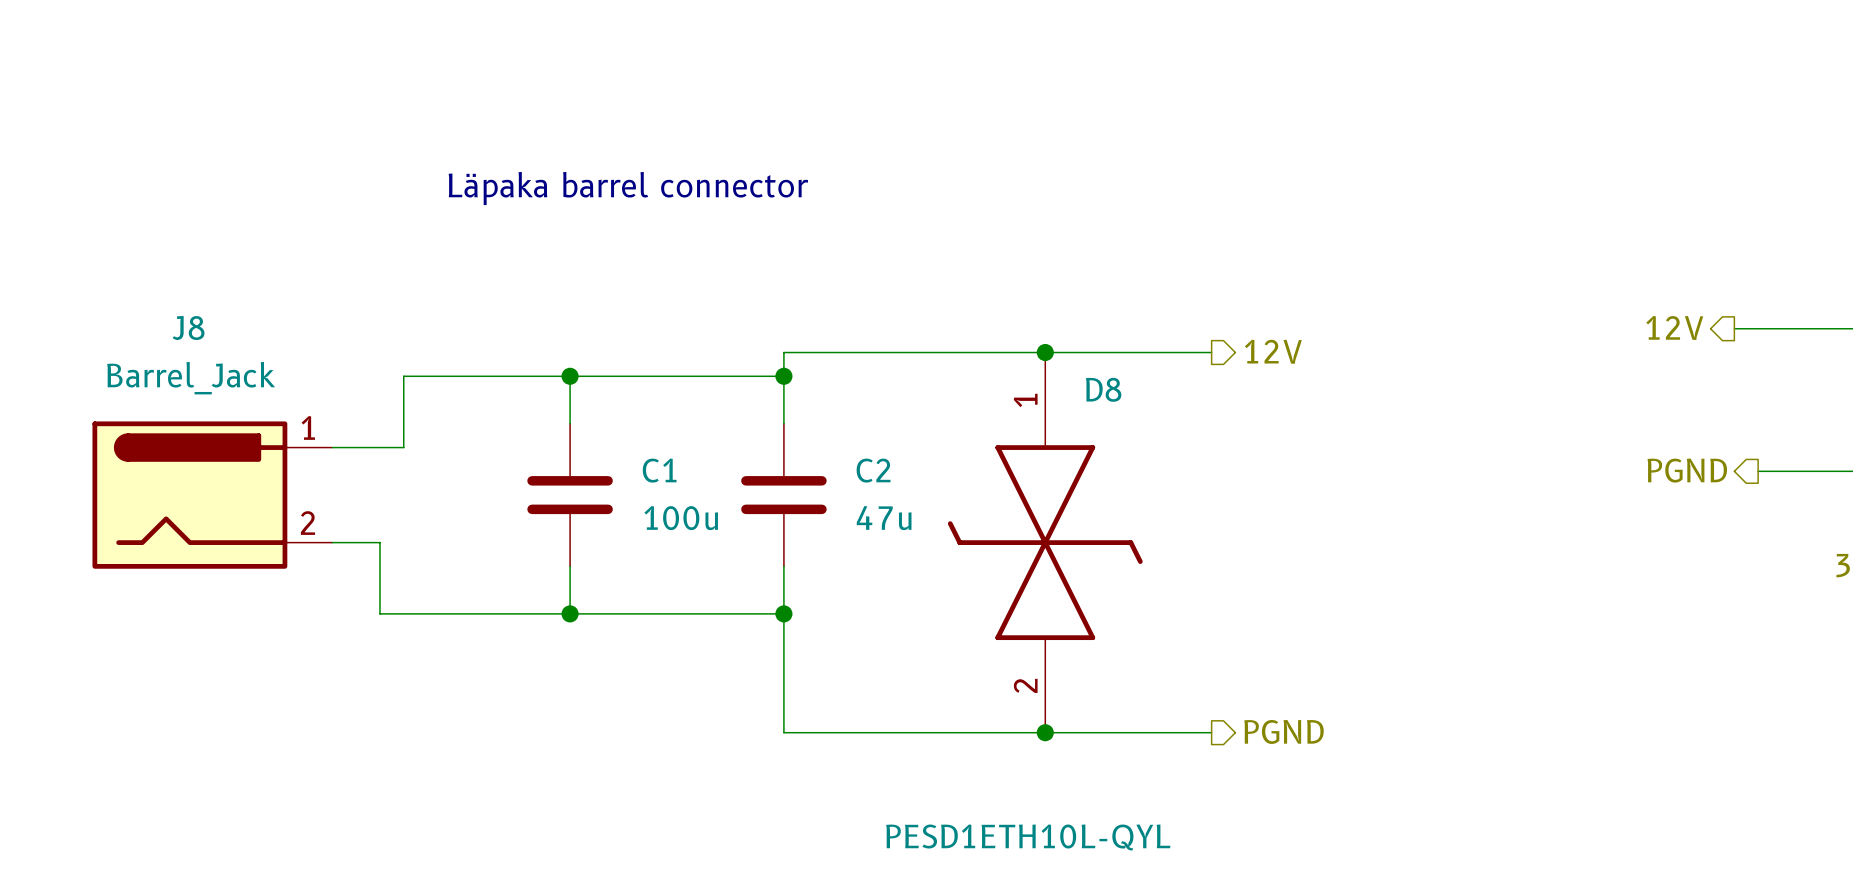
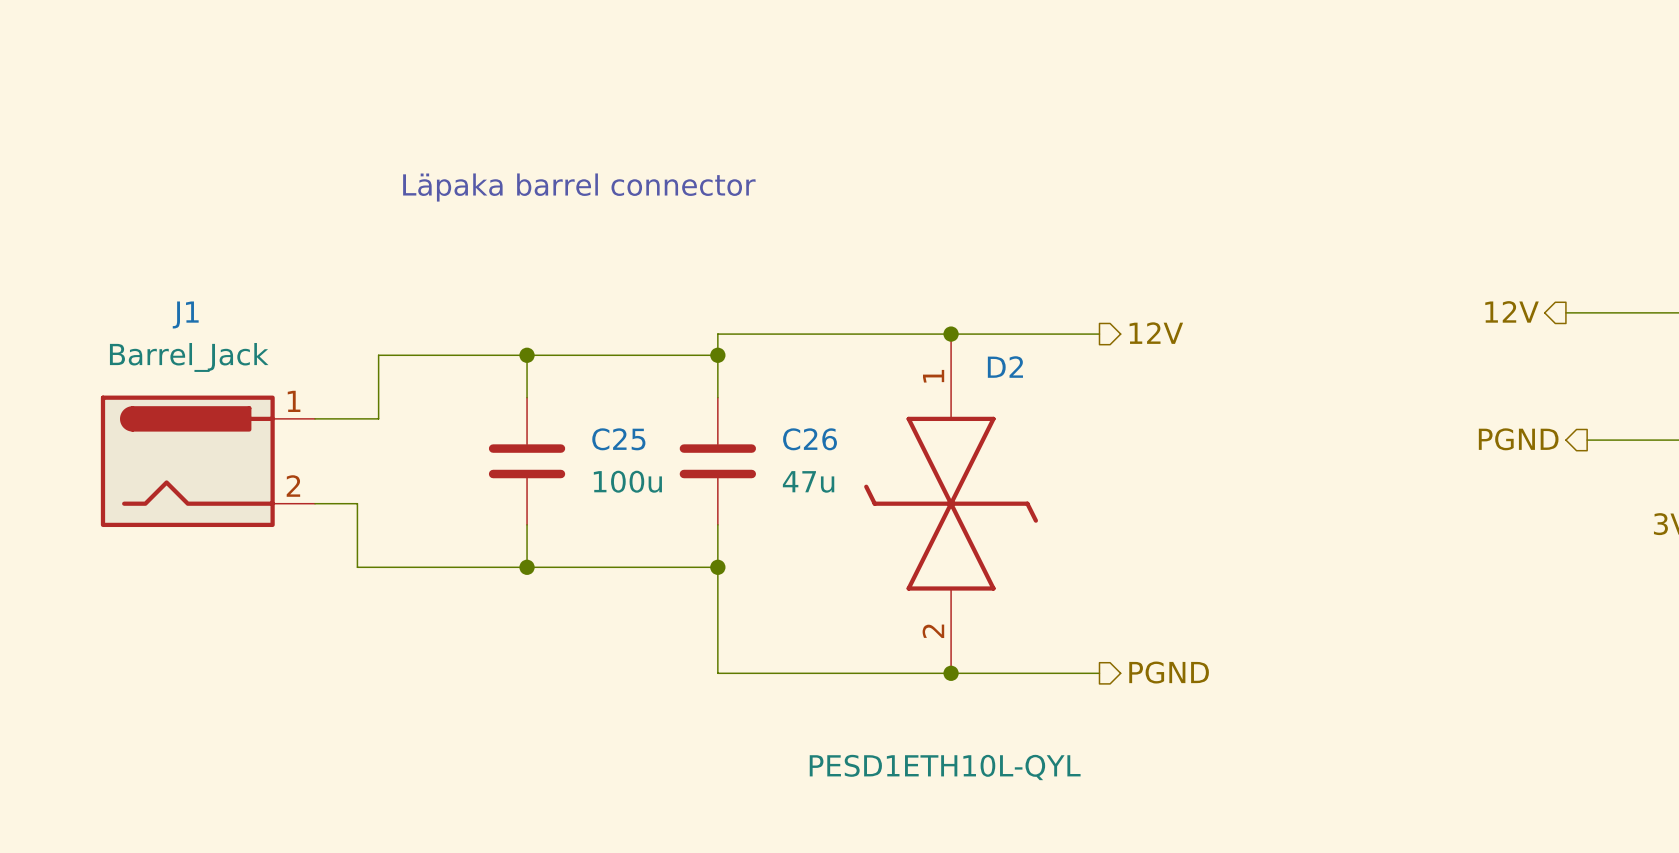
J8 name: J8 (188, 328) -> J1 (185, 314)
D8 name: D8 (1103, 389) -> D2 (1005, 367)
C1 name: C1 (659, 470) -> C25 (618, 439)
C2 name: C2 (873, 470) -> C26 (810, 439)

